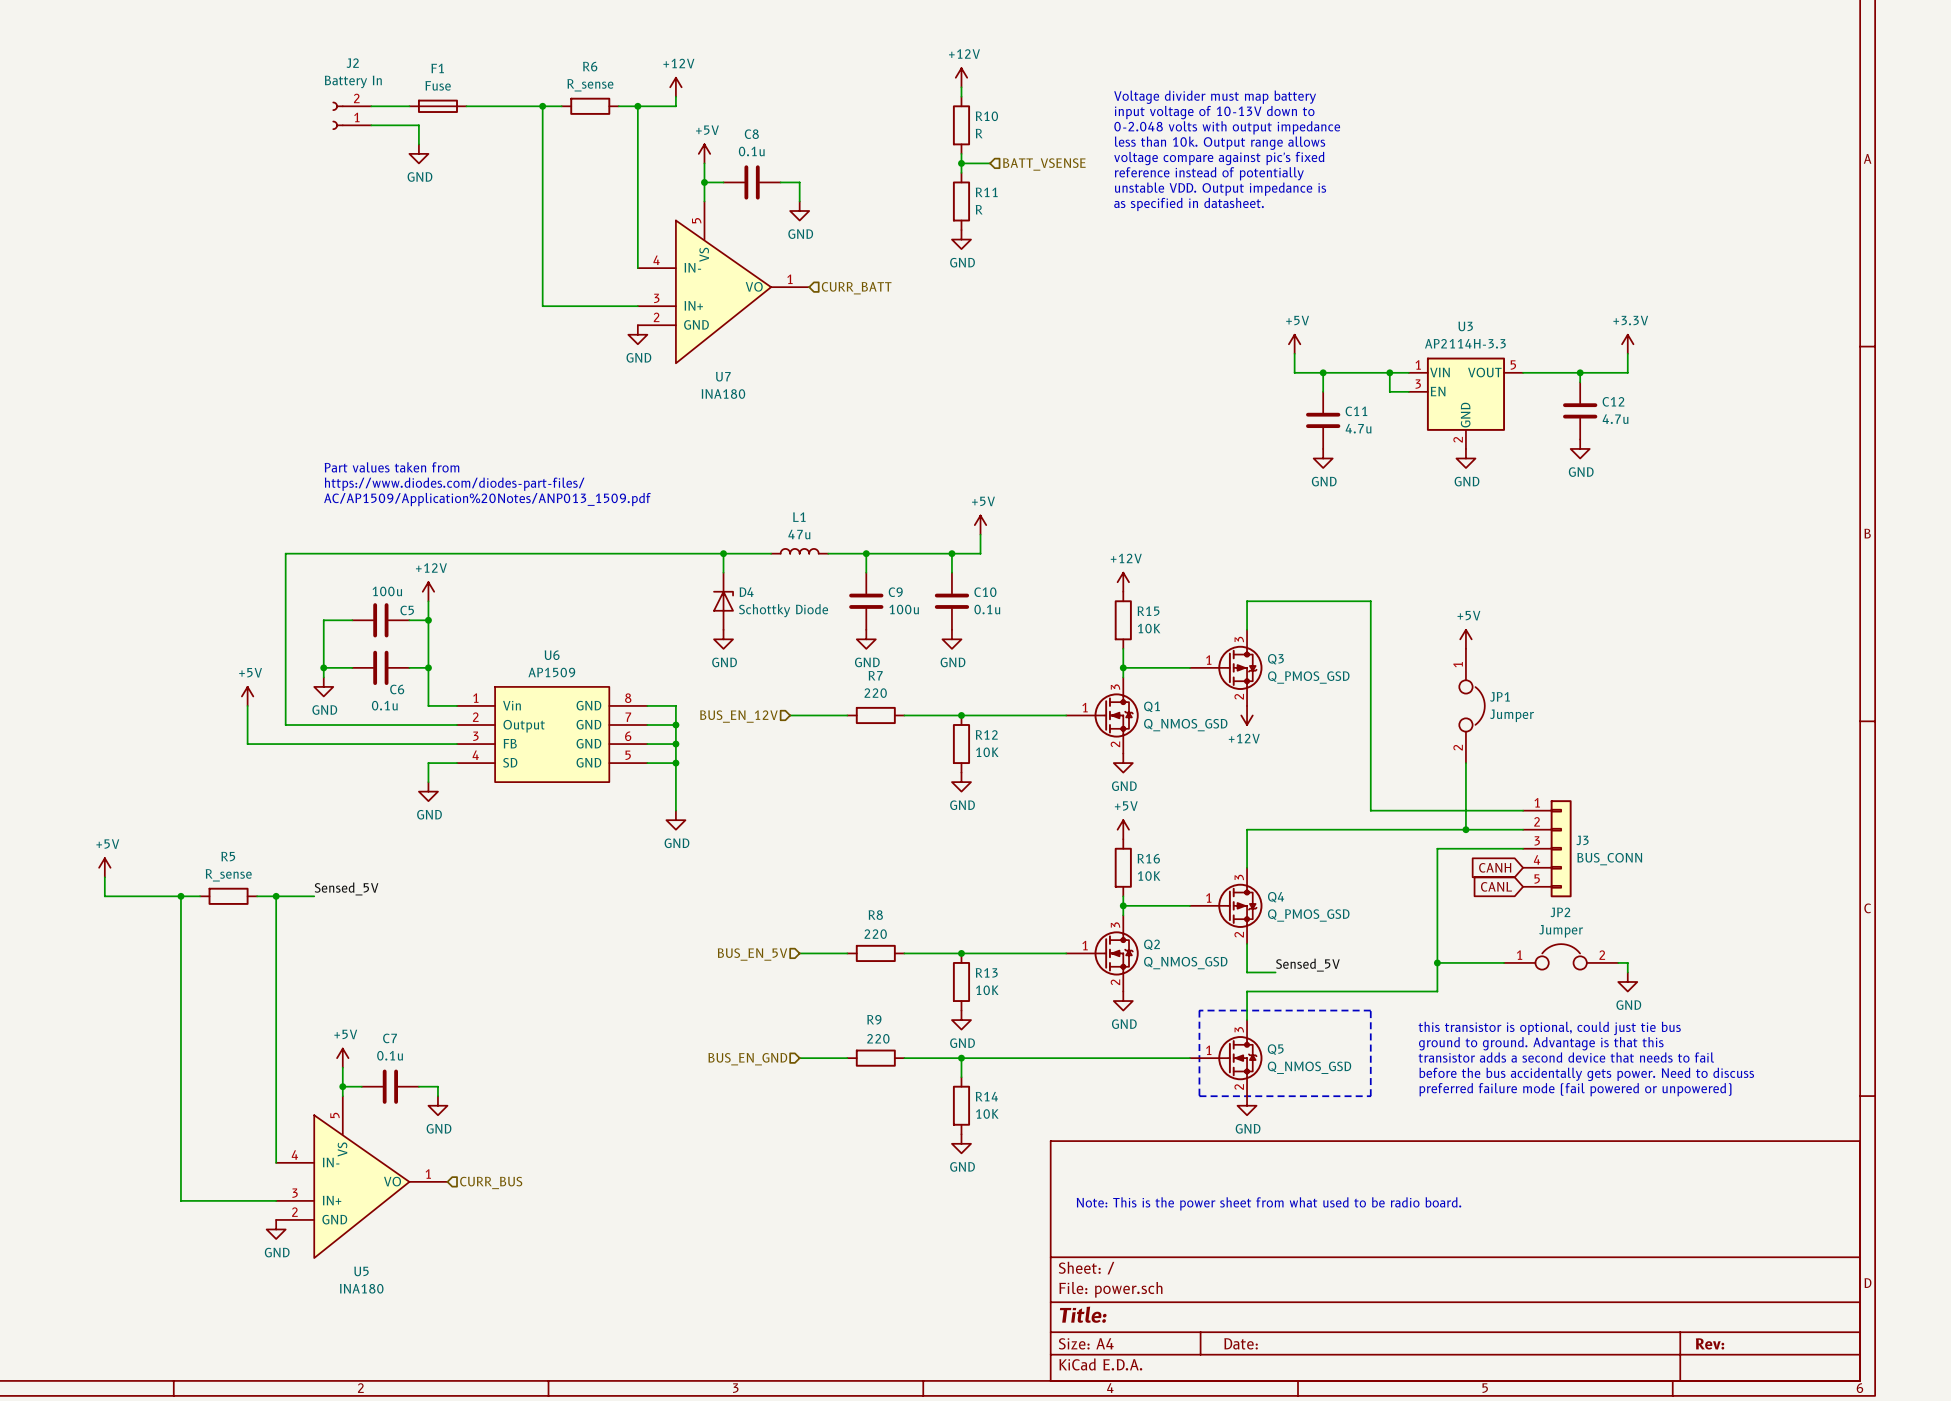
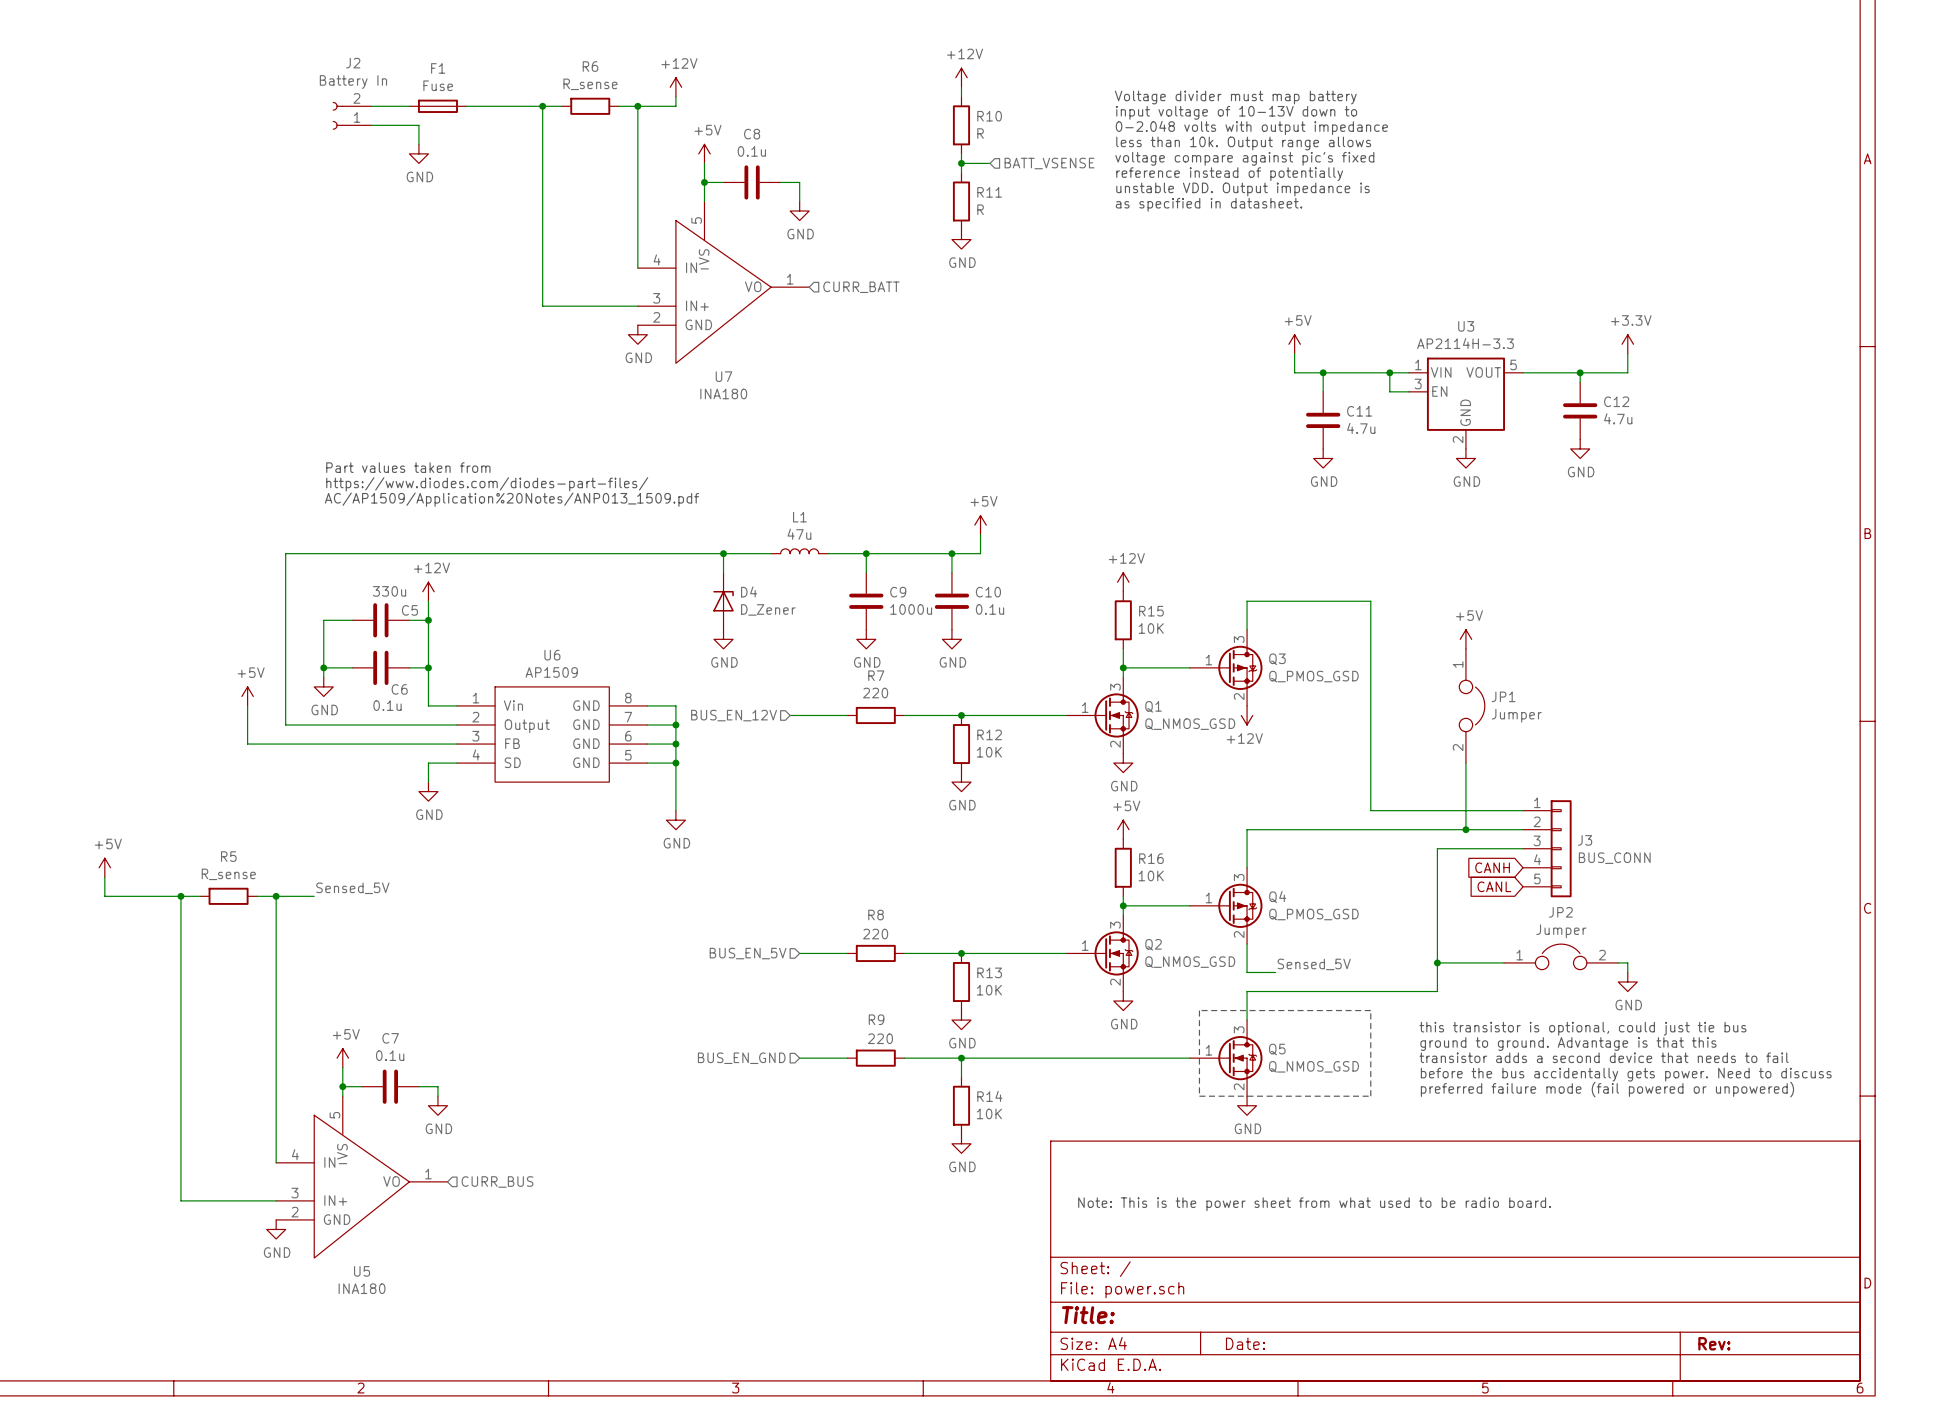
C5 value: 100u (387, 591) -> 330u (389, 591)
C9 value: 100u (904, 609) -> 1000u (911, 609)
D4 value: Schottky Diode (783, 610) -> D_Zener (768, 609)

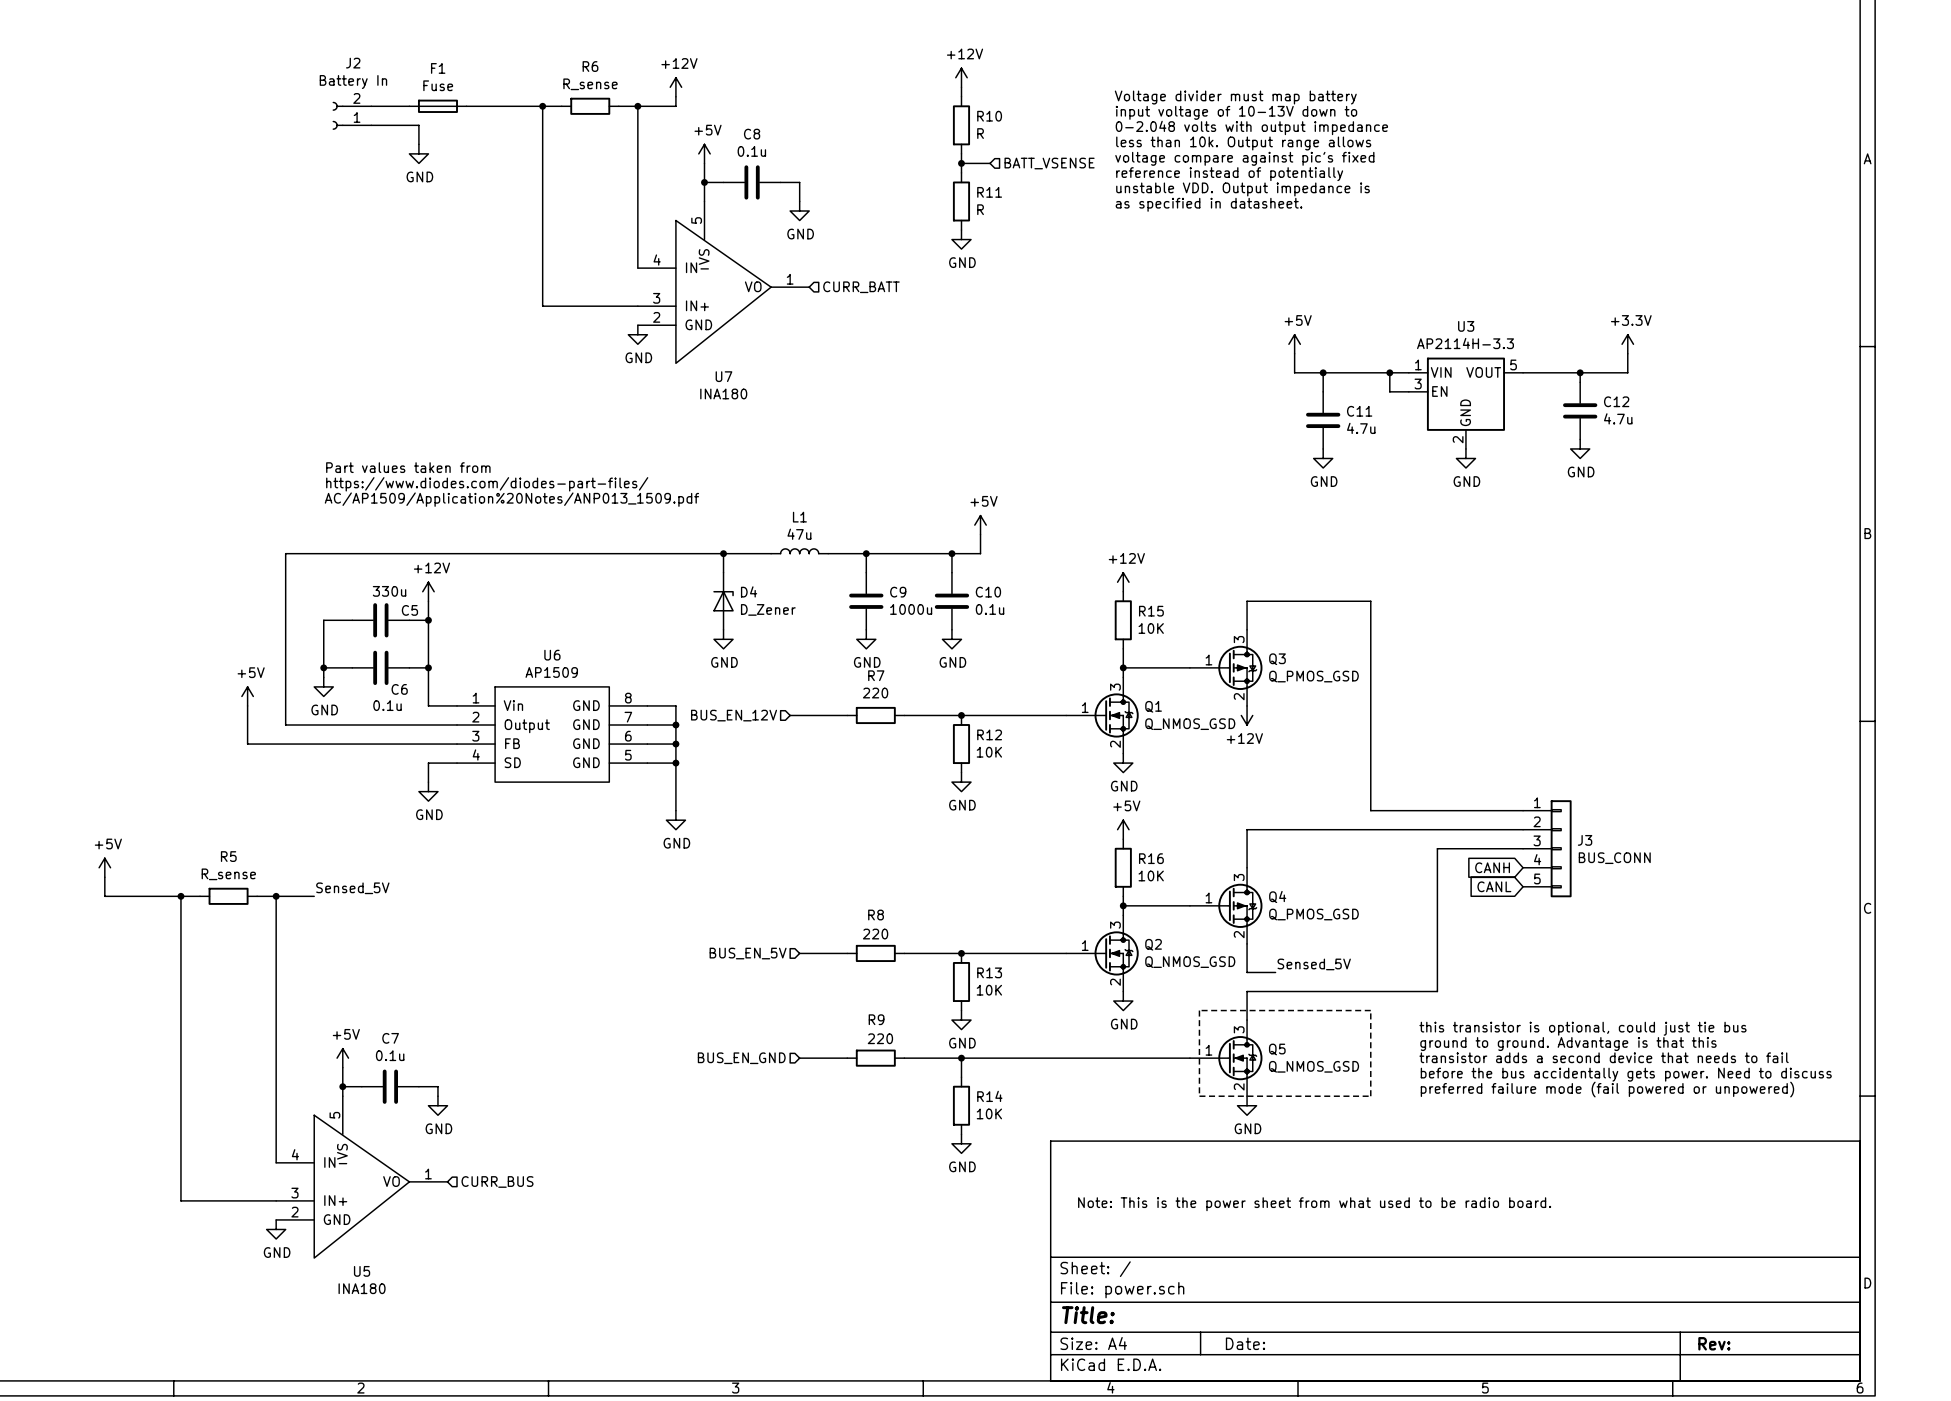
power symbol: +5V (1465, 639) -> none
JP1: Jumper (1472, 705) -> none
wire: (1465, 763) (1465, 829) -> none
junction: (1465, 829) -> none
JP2: Jumper (1561, 956) -> none
wire: (1437, 962) (1504, 962) -> none
junction: (1437, 962) -> none
wire: (1618, 962) (1627, 962) (1627, 972) -> none
power symbol: GND (1627, 981) -> none

